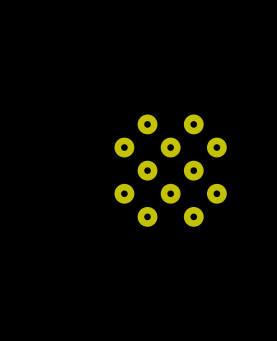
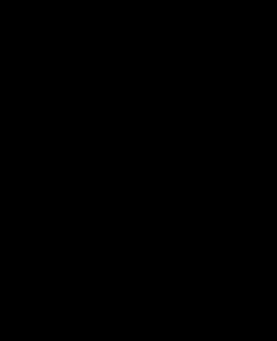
part: (170, 170) -> none

